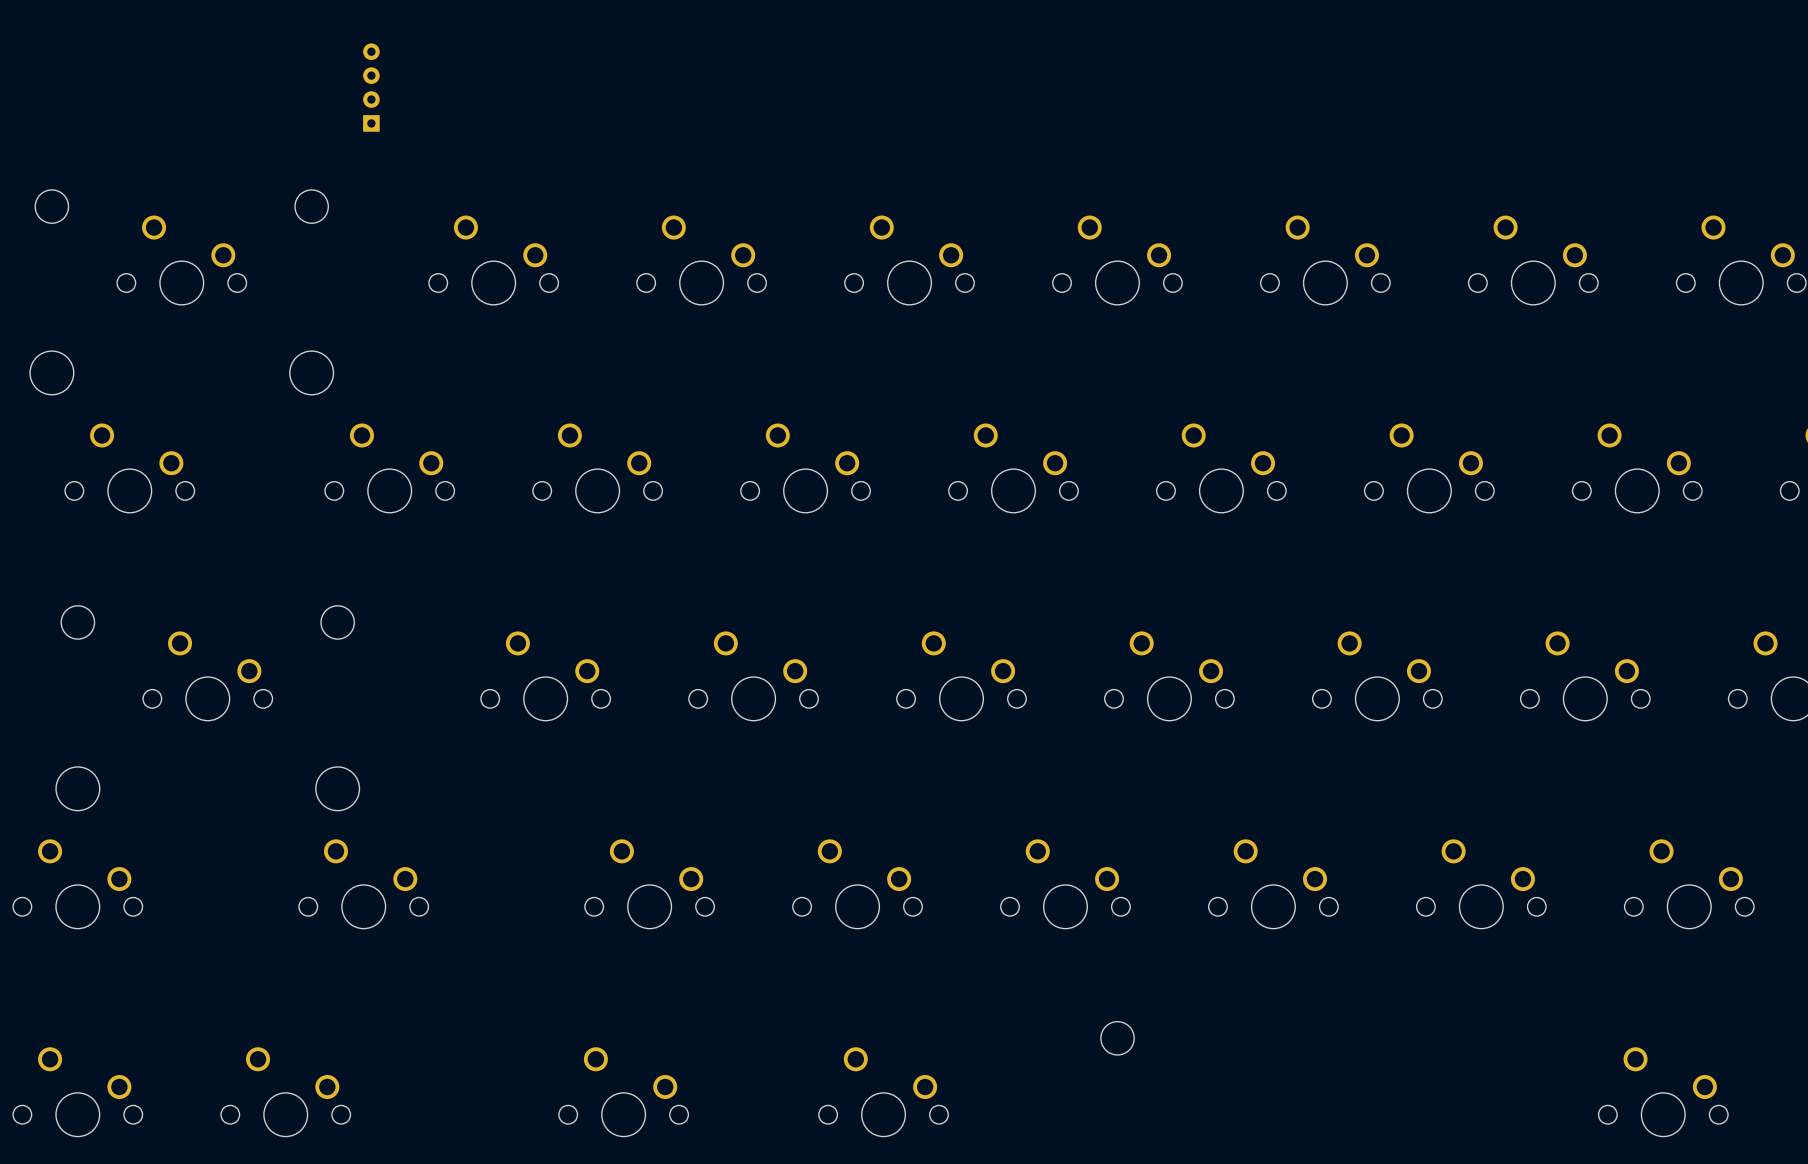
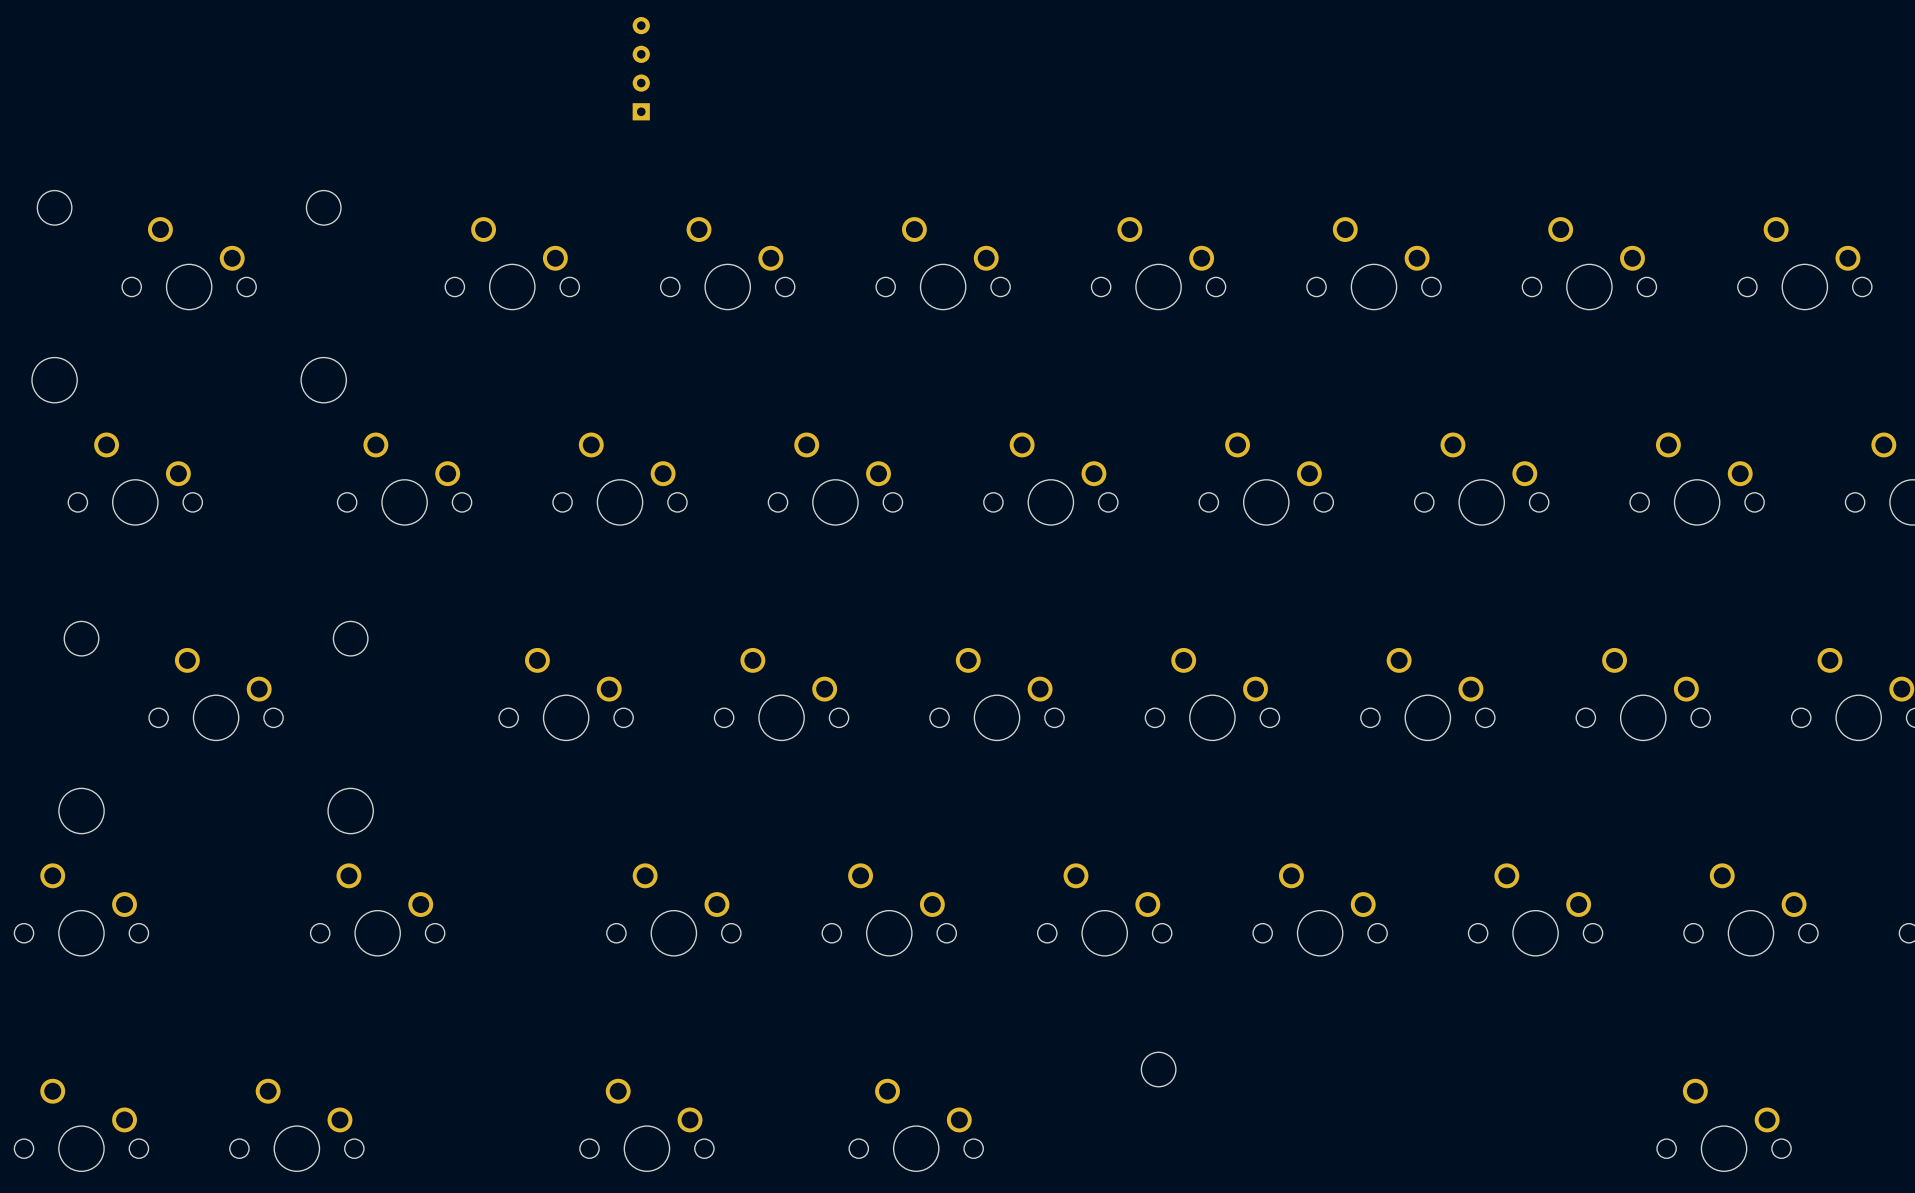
part: none -> (641, 68)
part: (371, 87) -> none

